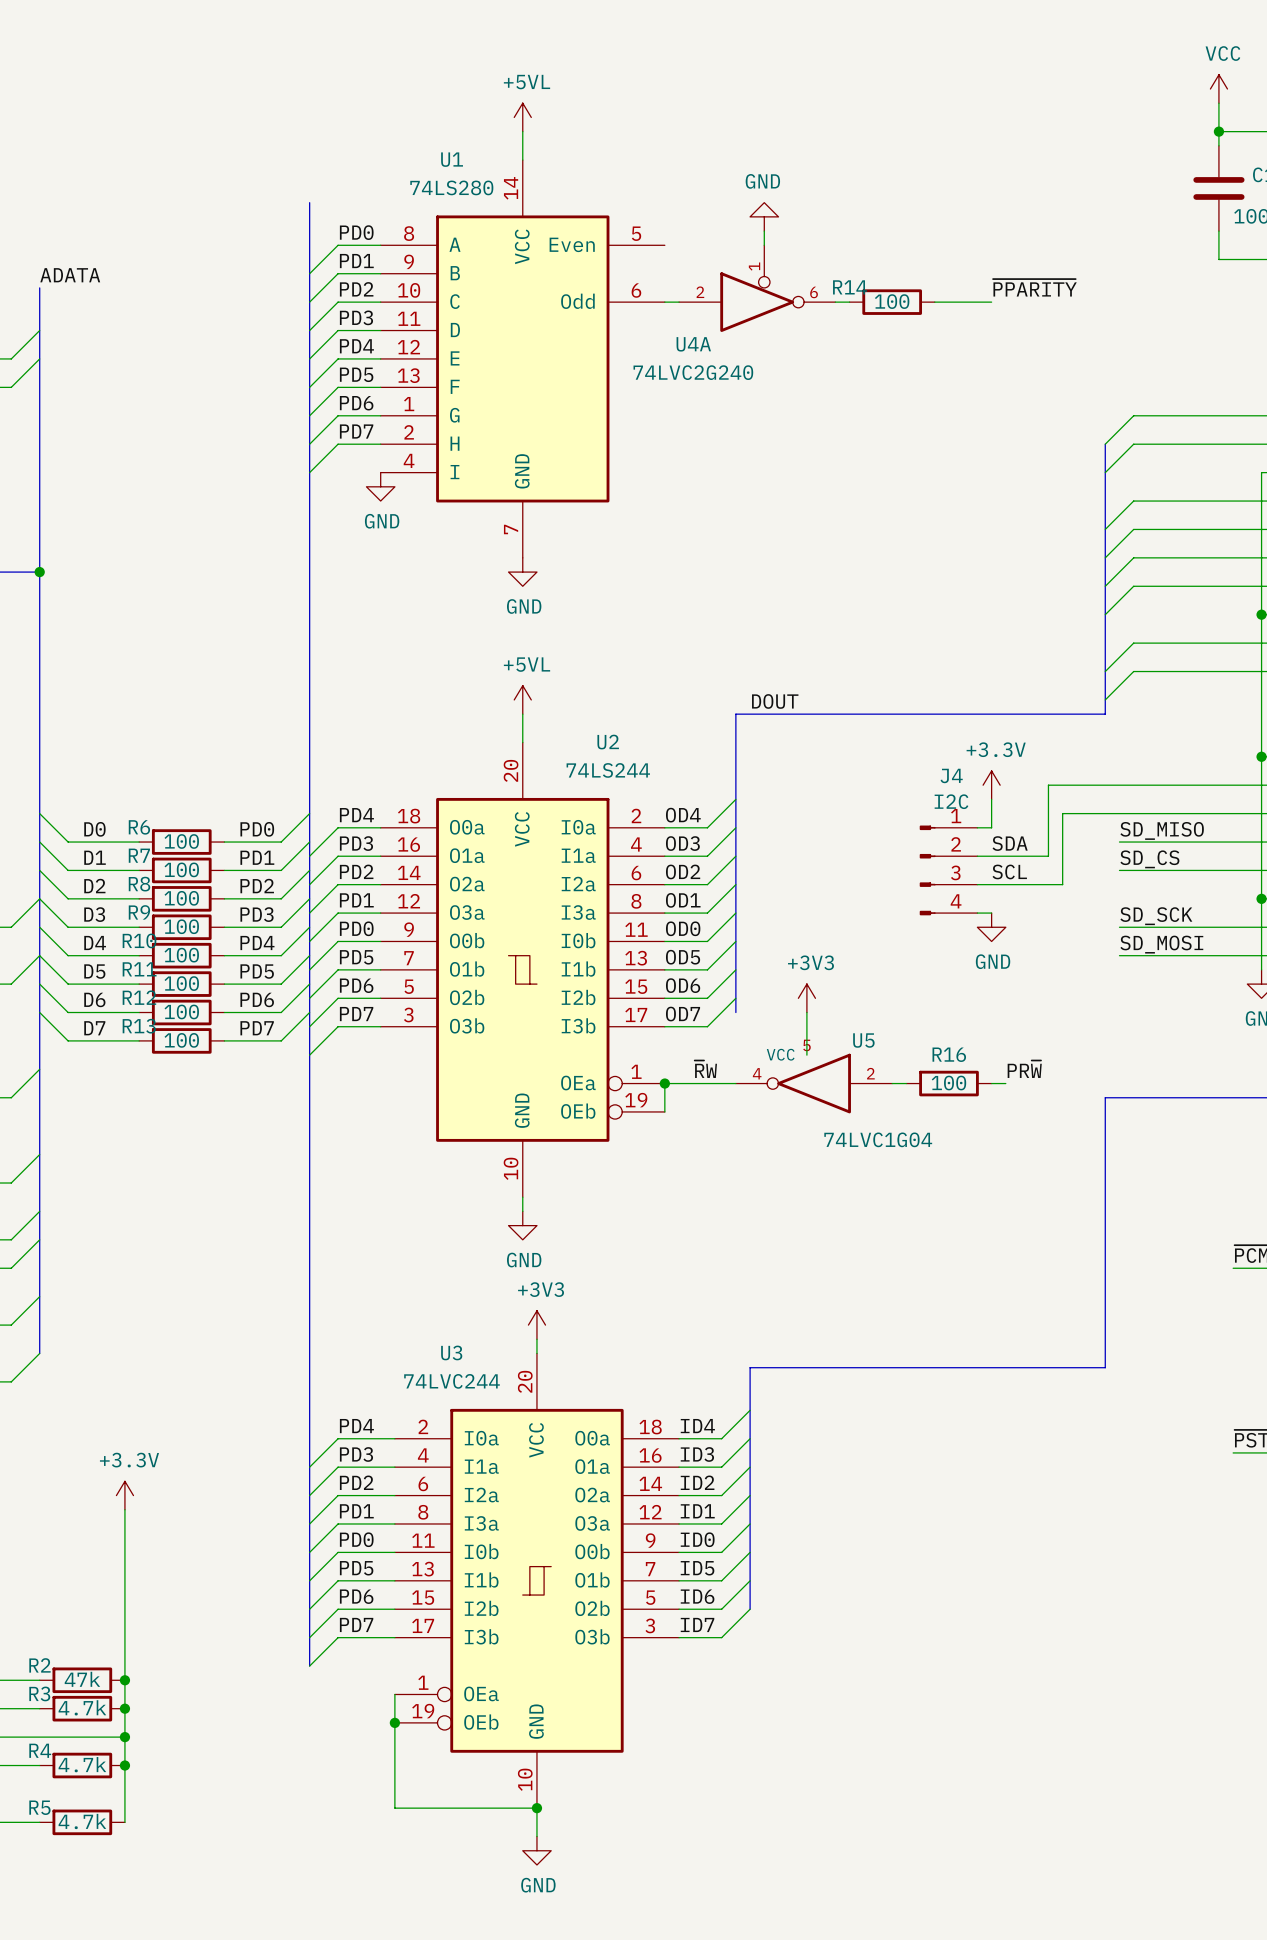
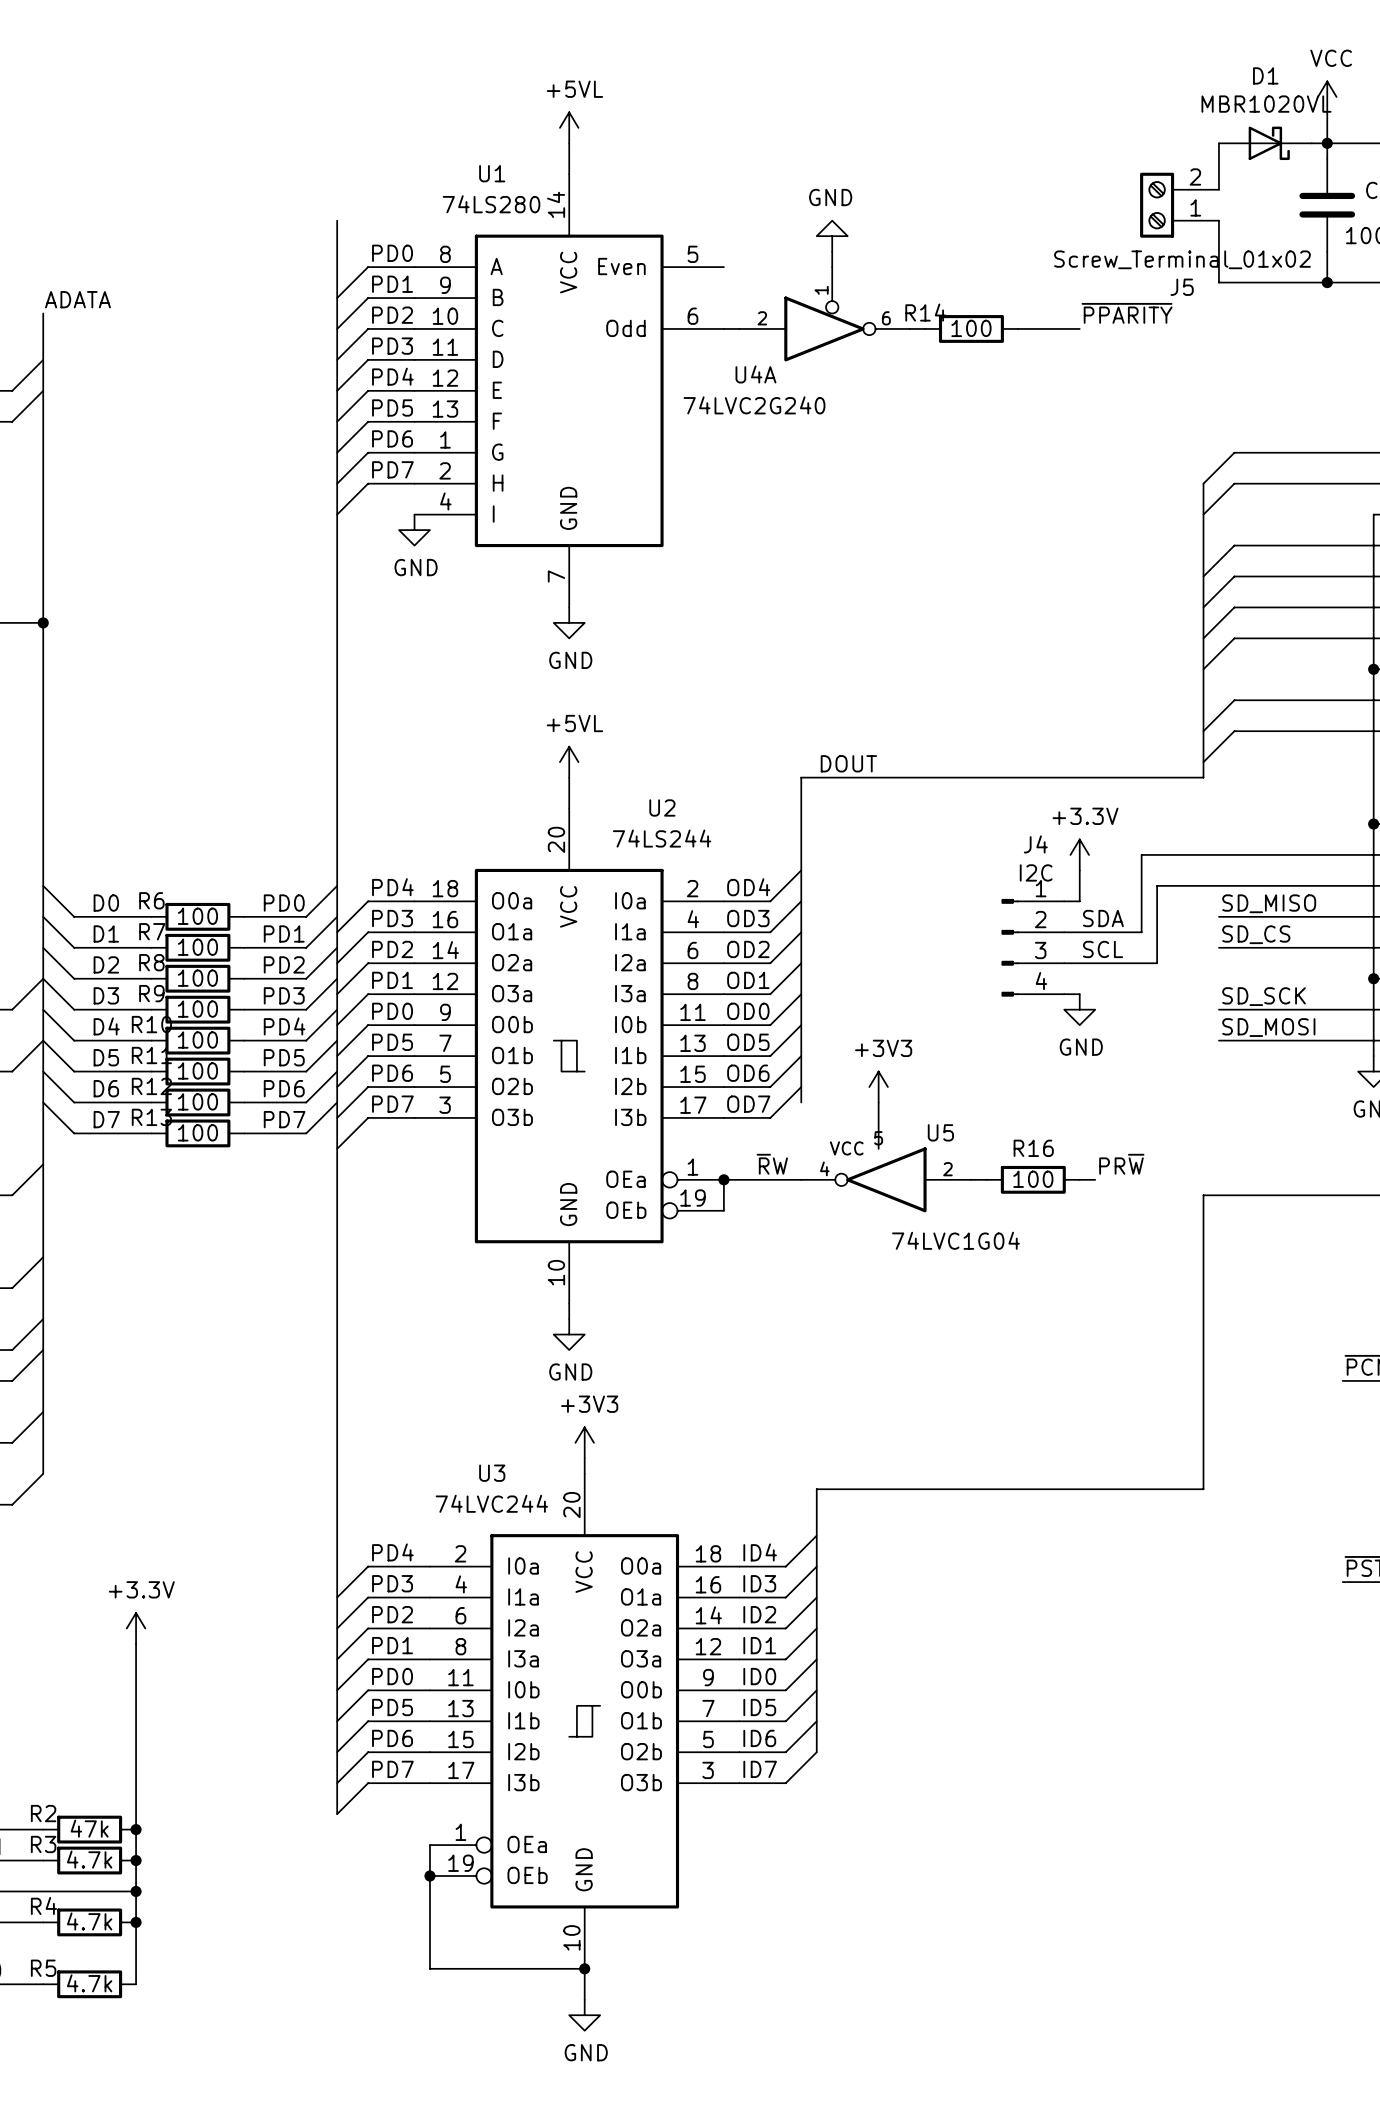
wire: none -> (1218, 143) (1218, 189)
D1: none -> MBR1020VL (1265, 143)
wire: none -> (1311, 143) (1327, 143)
J5: none -> Screw_Terminal_01x02 (1179, 205)
wire: none -> (1218, 220) (1218, 282) (1327, 282)
junction: none -> (1327, 282)

